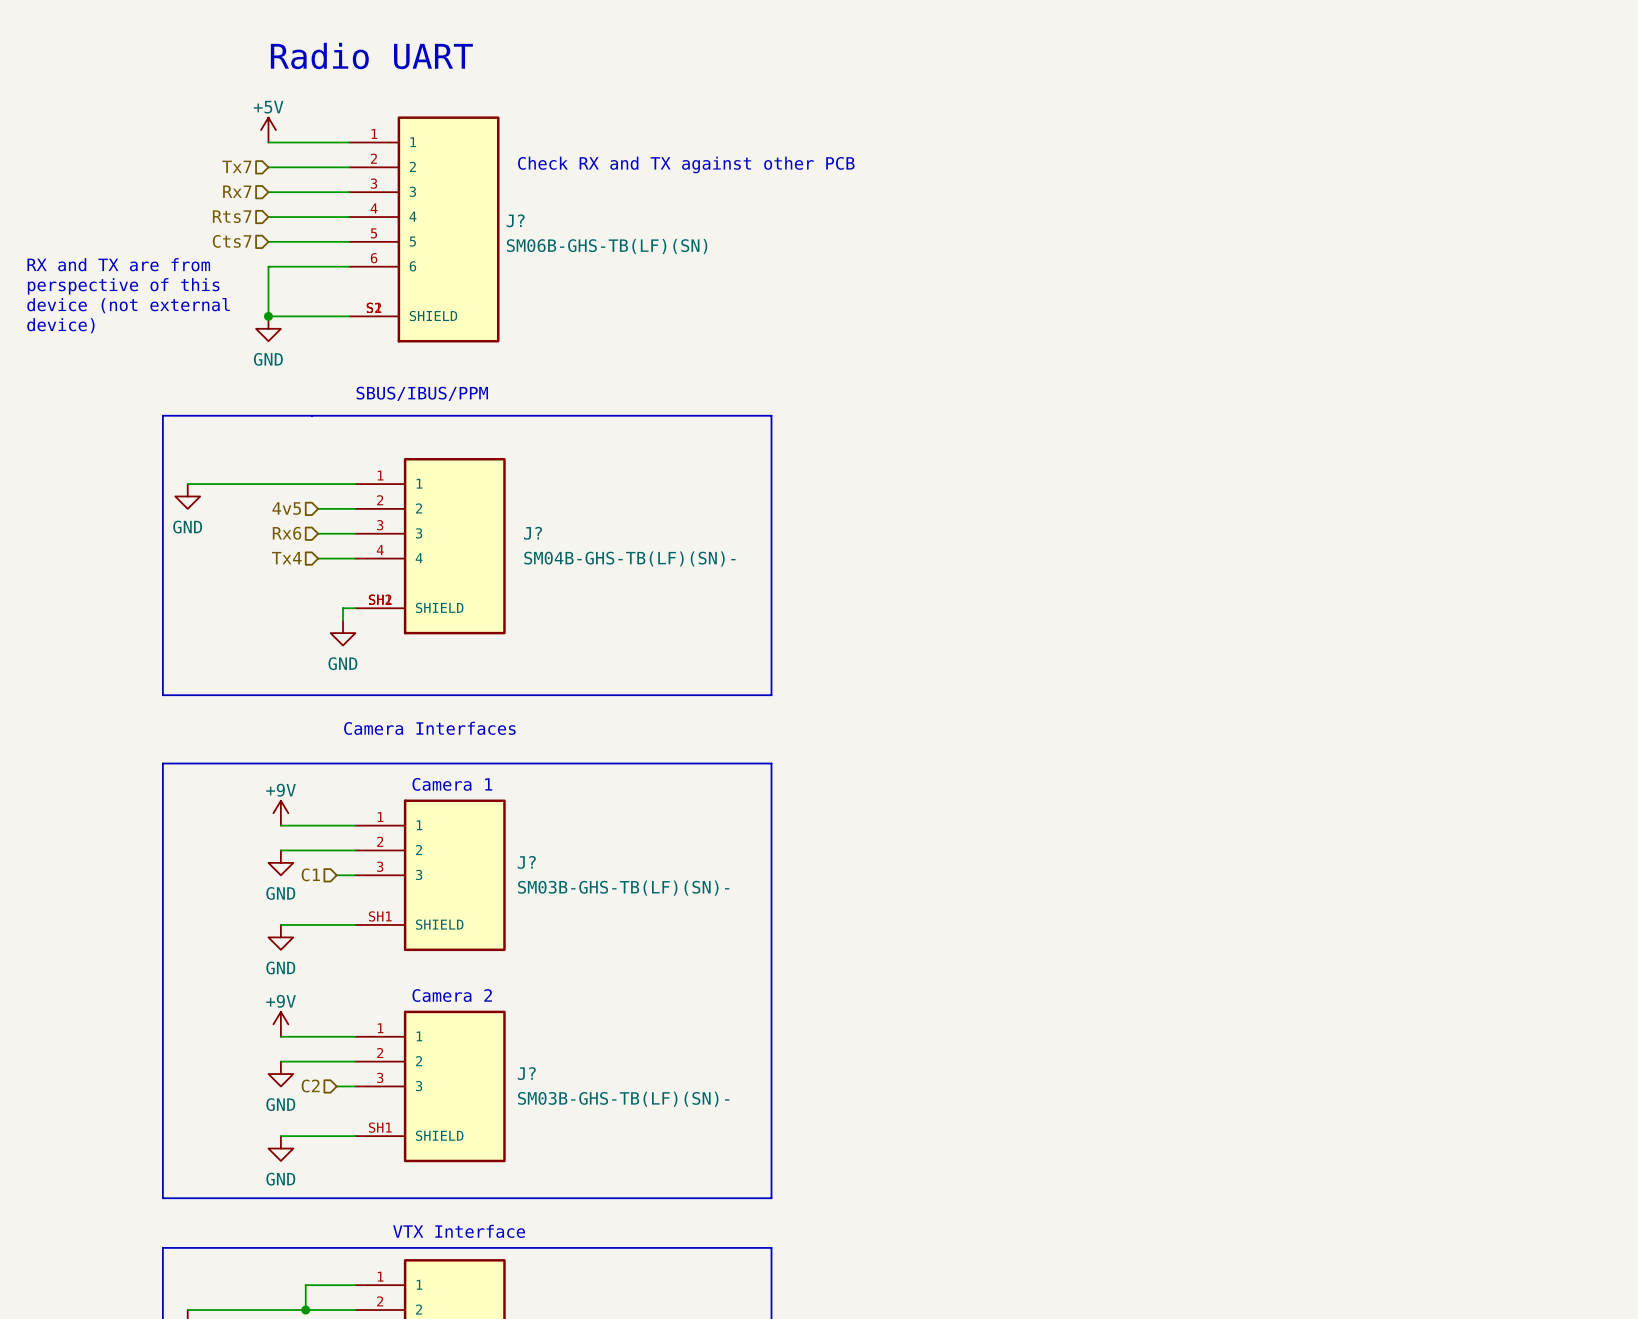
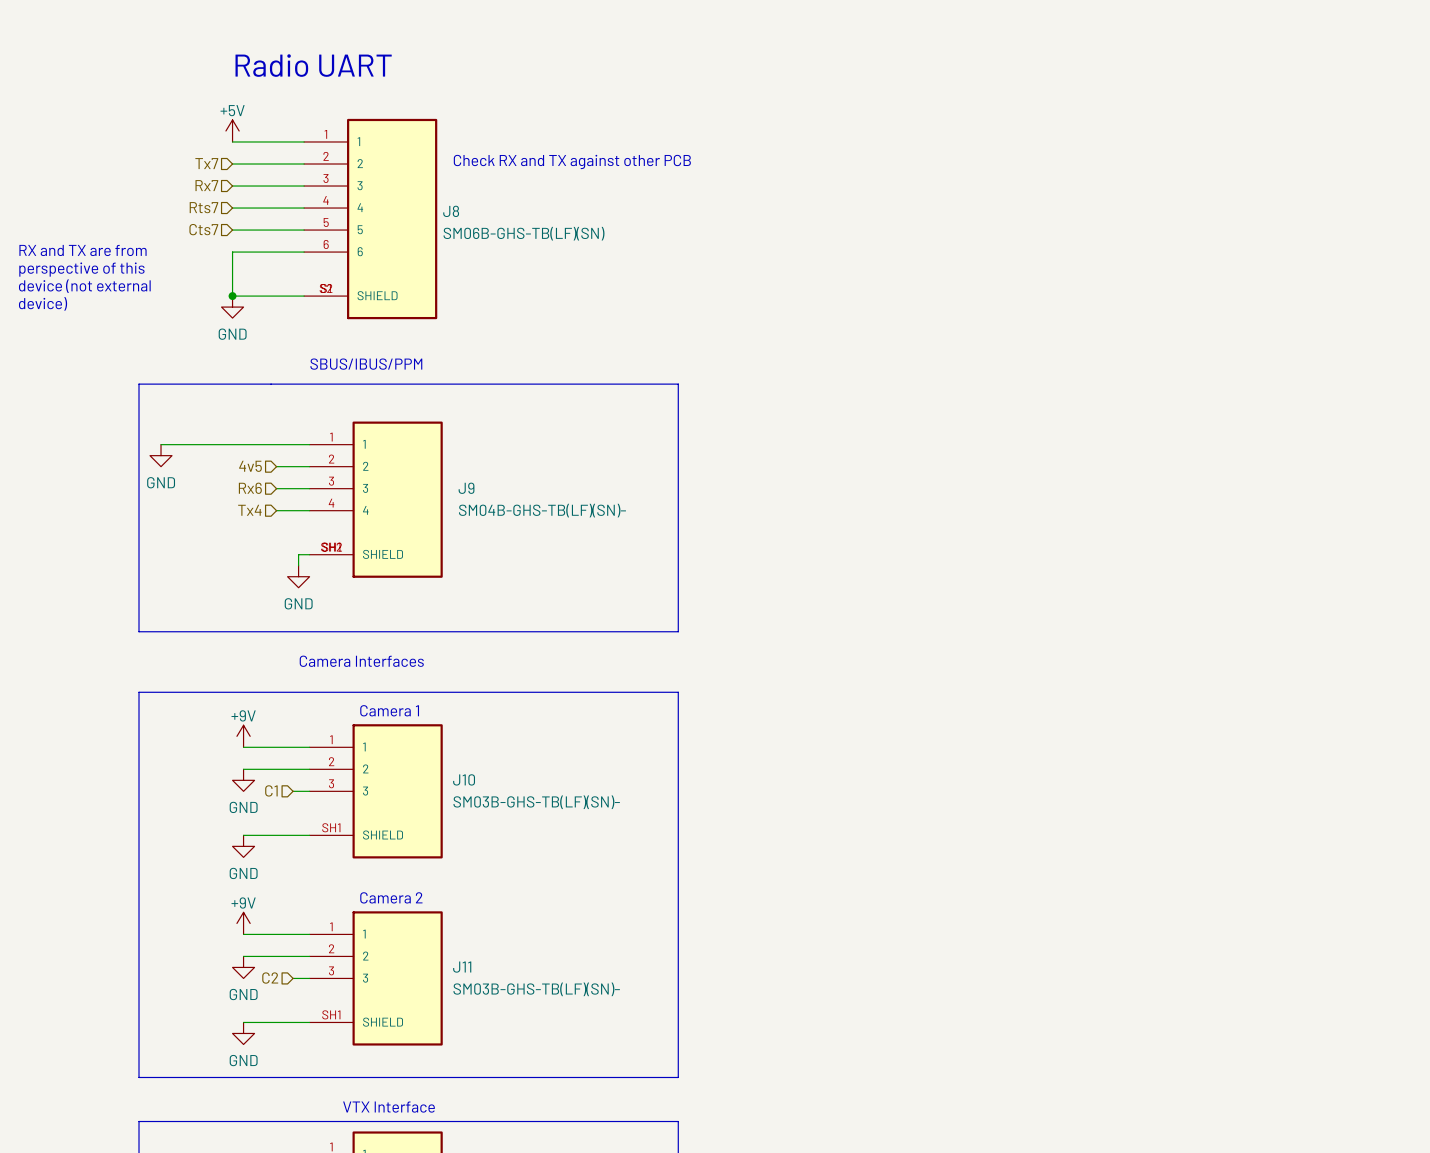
J? name: J? (515, 220) -> J8 (451, 211)
J? name: J? (533, 533) -> J9 (466, 488)
J? name: J? (526, 862) -> J10 (464, 779)
J? name: J? (526, 1073) -> J11 (462, 967)

